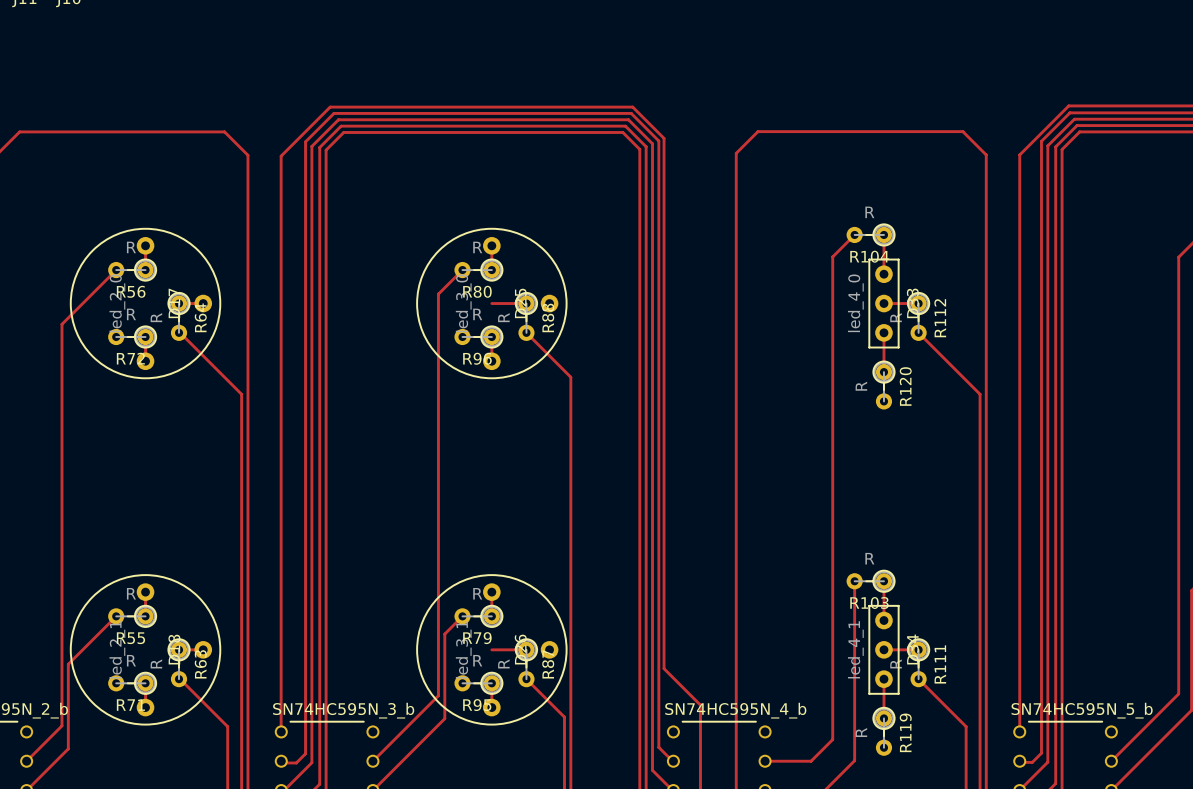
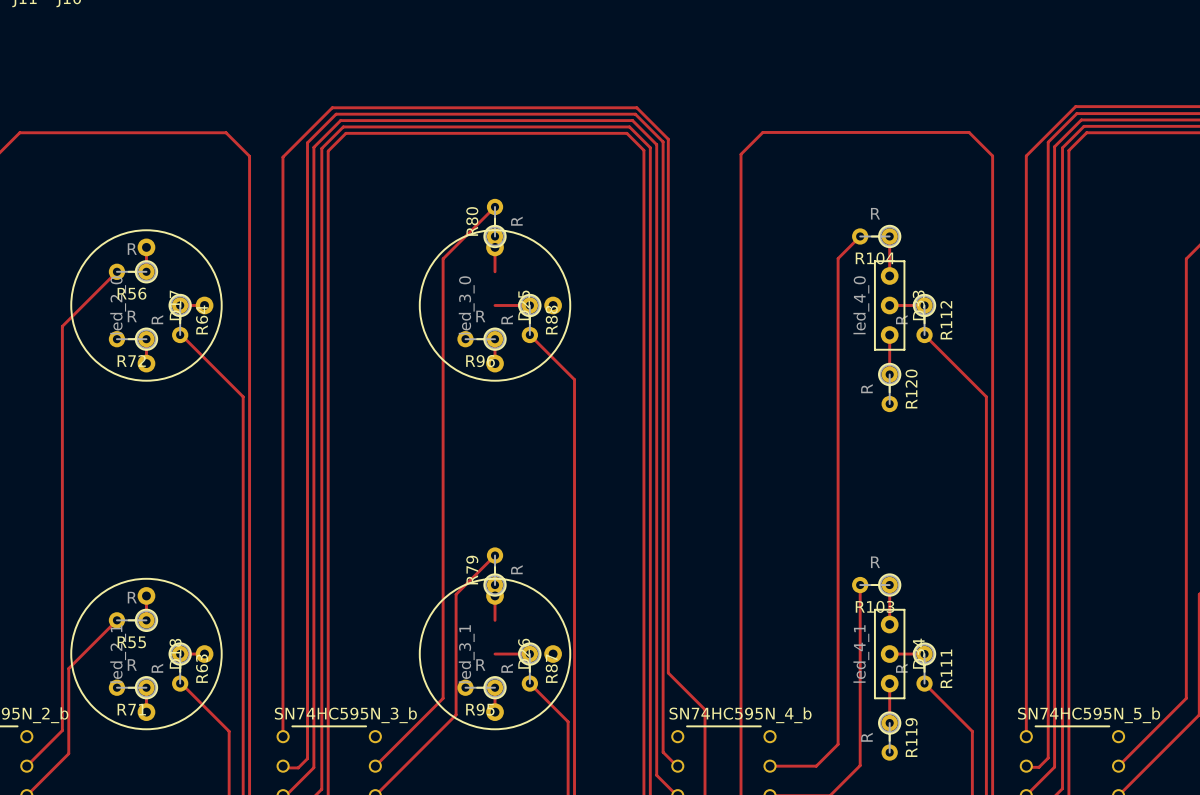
track: (462, 270) (438, 294) (438, 695) -> (495, 206) (443, 258) (443, 698) (441, 700)
R80 rotation: 0° (478, 270) -> 90° clockwise (495, 223)
R80 position: (478, 270) -> (495, 223)
track: (462, 616) (444, 634) (444, 718) -> (495, 555) (456, 594) (456, 714) (447, 723)
R79 rotation: 0° (478, 616) -> 90° clockwise (495, 571)
R79 position: (478, 616) -> (495, 571)

